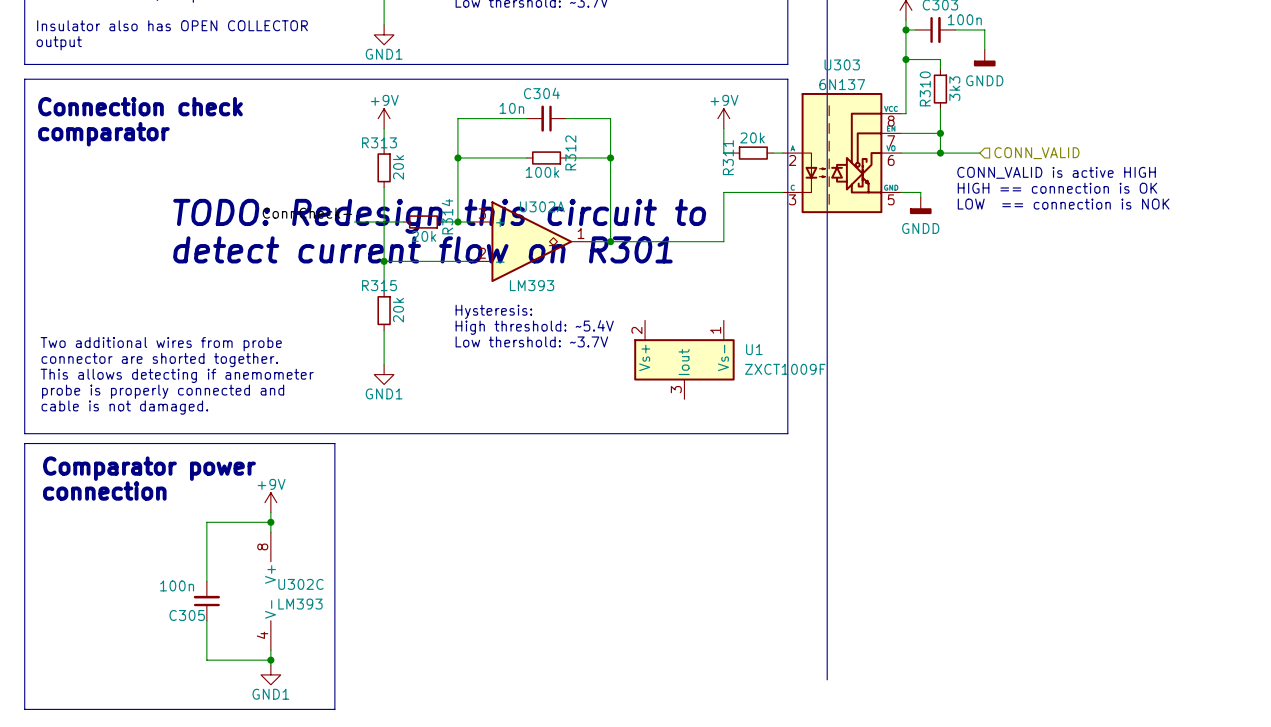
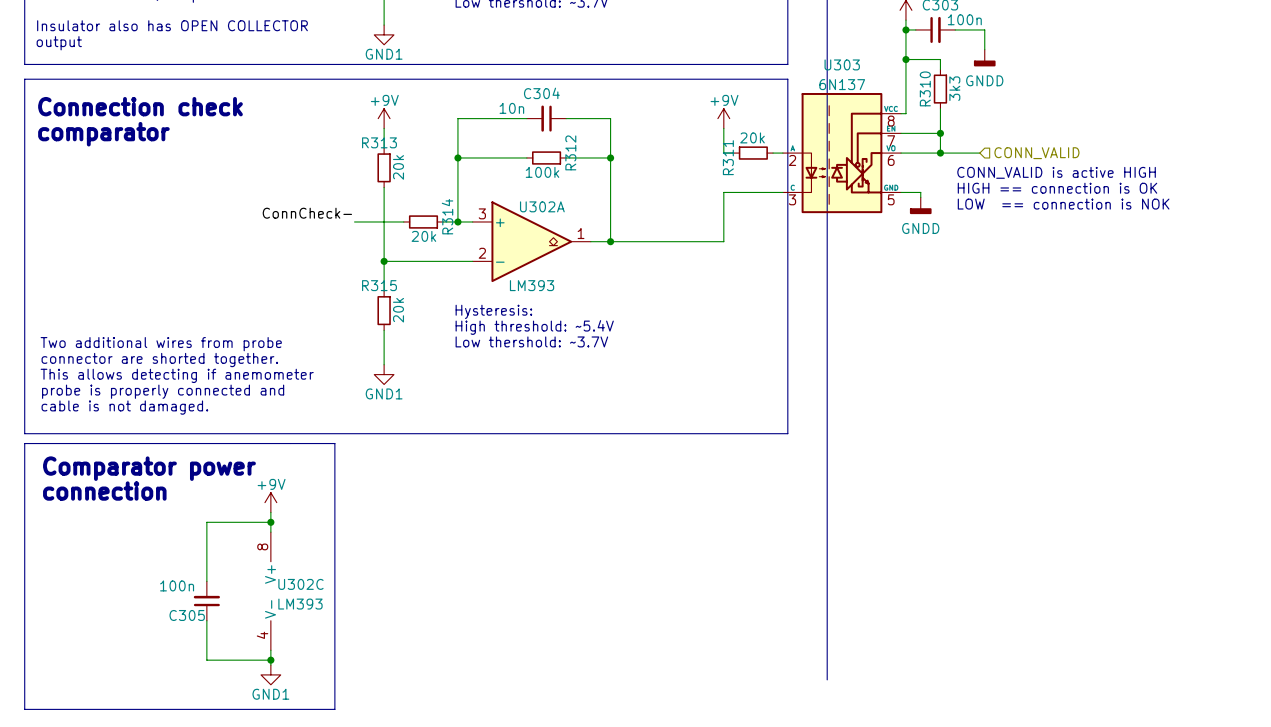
text: TODO: Redesign this circuit to (439, 216) -> none
text: detect current flow on R301 (422, 249) -> none
U1: ZXCT1009F (684, 359) -> none

